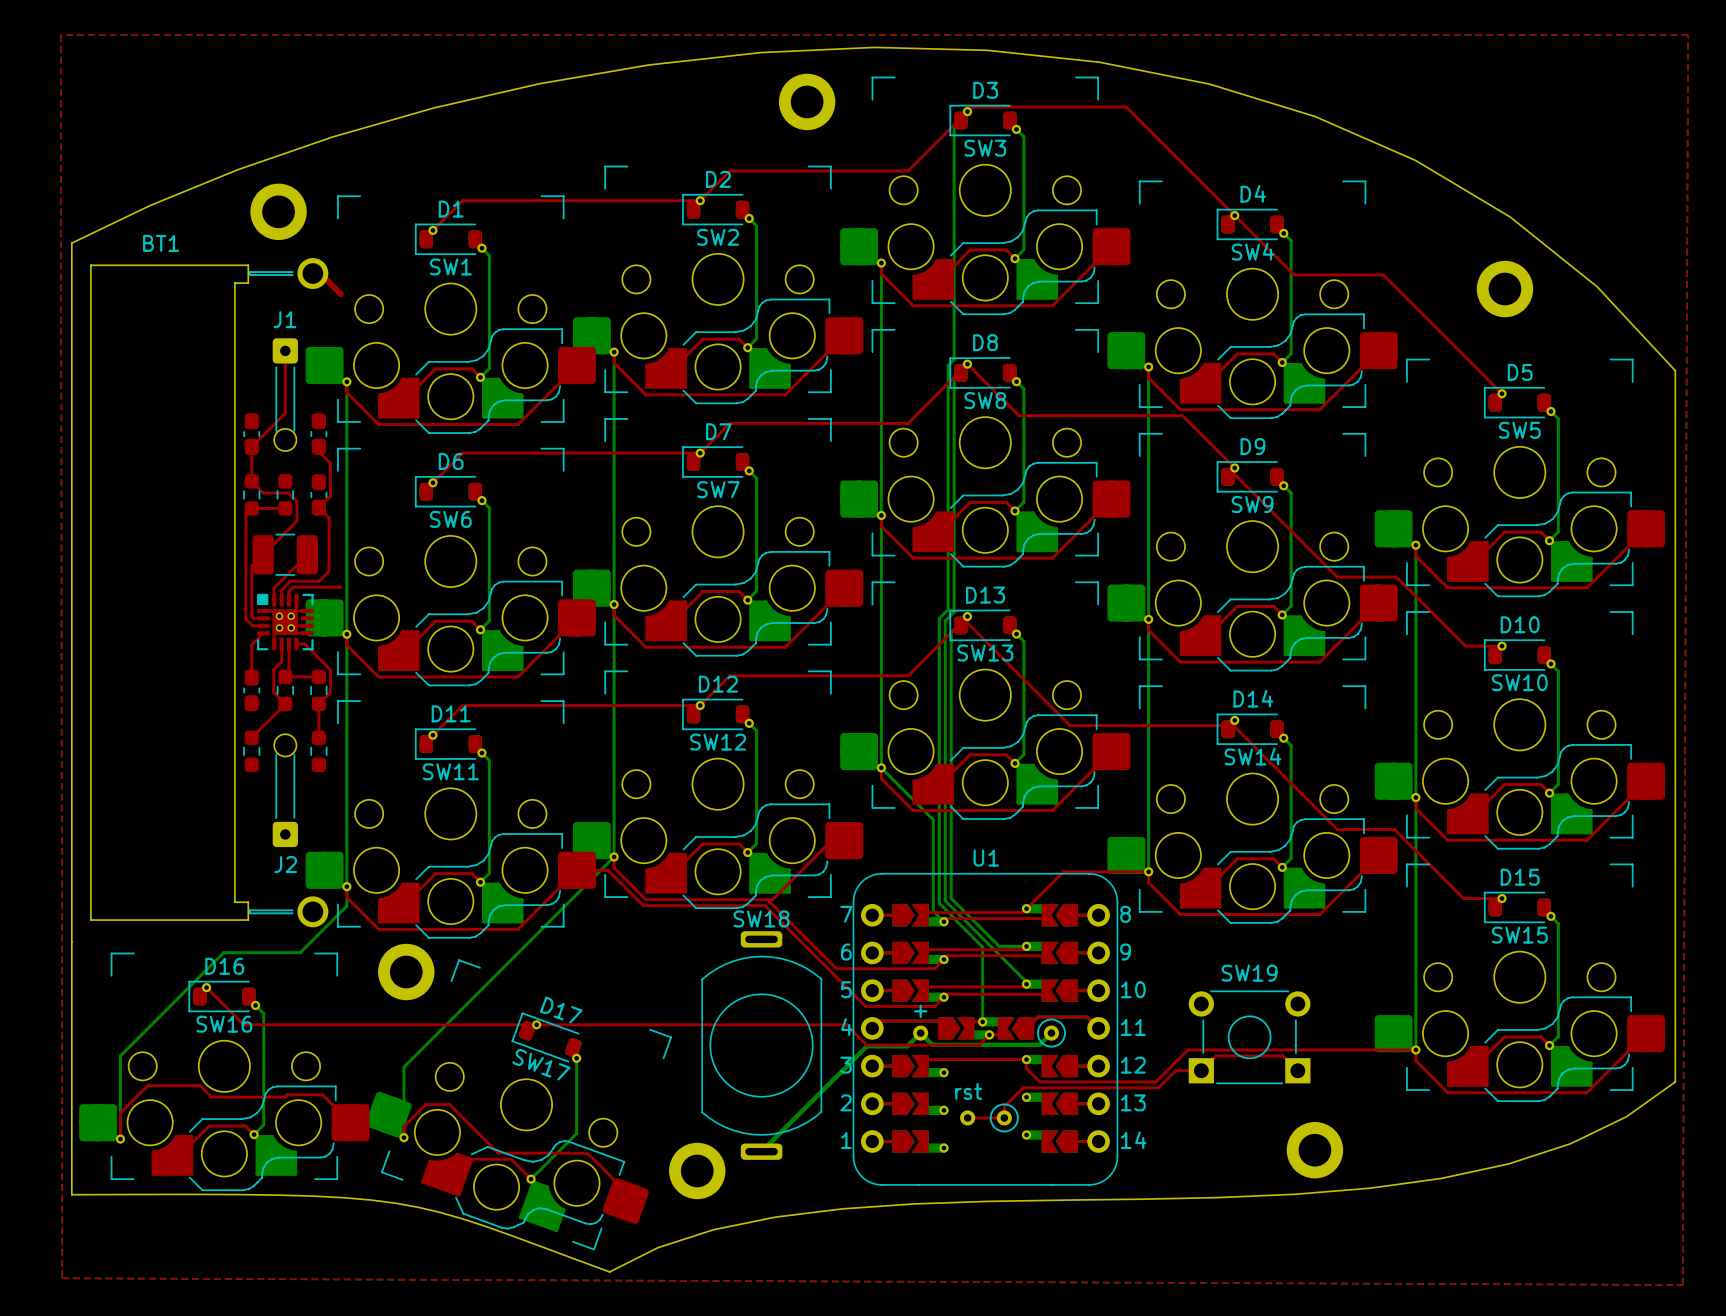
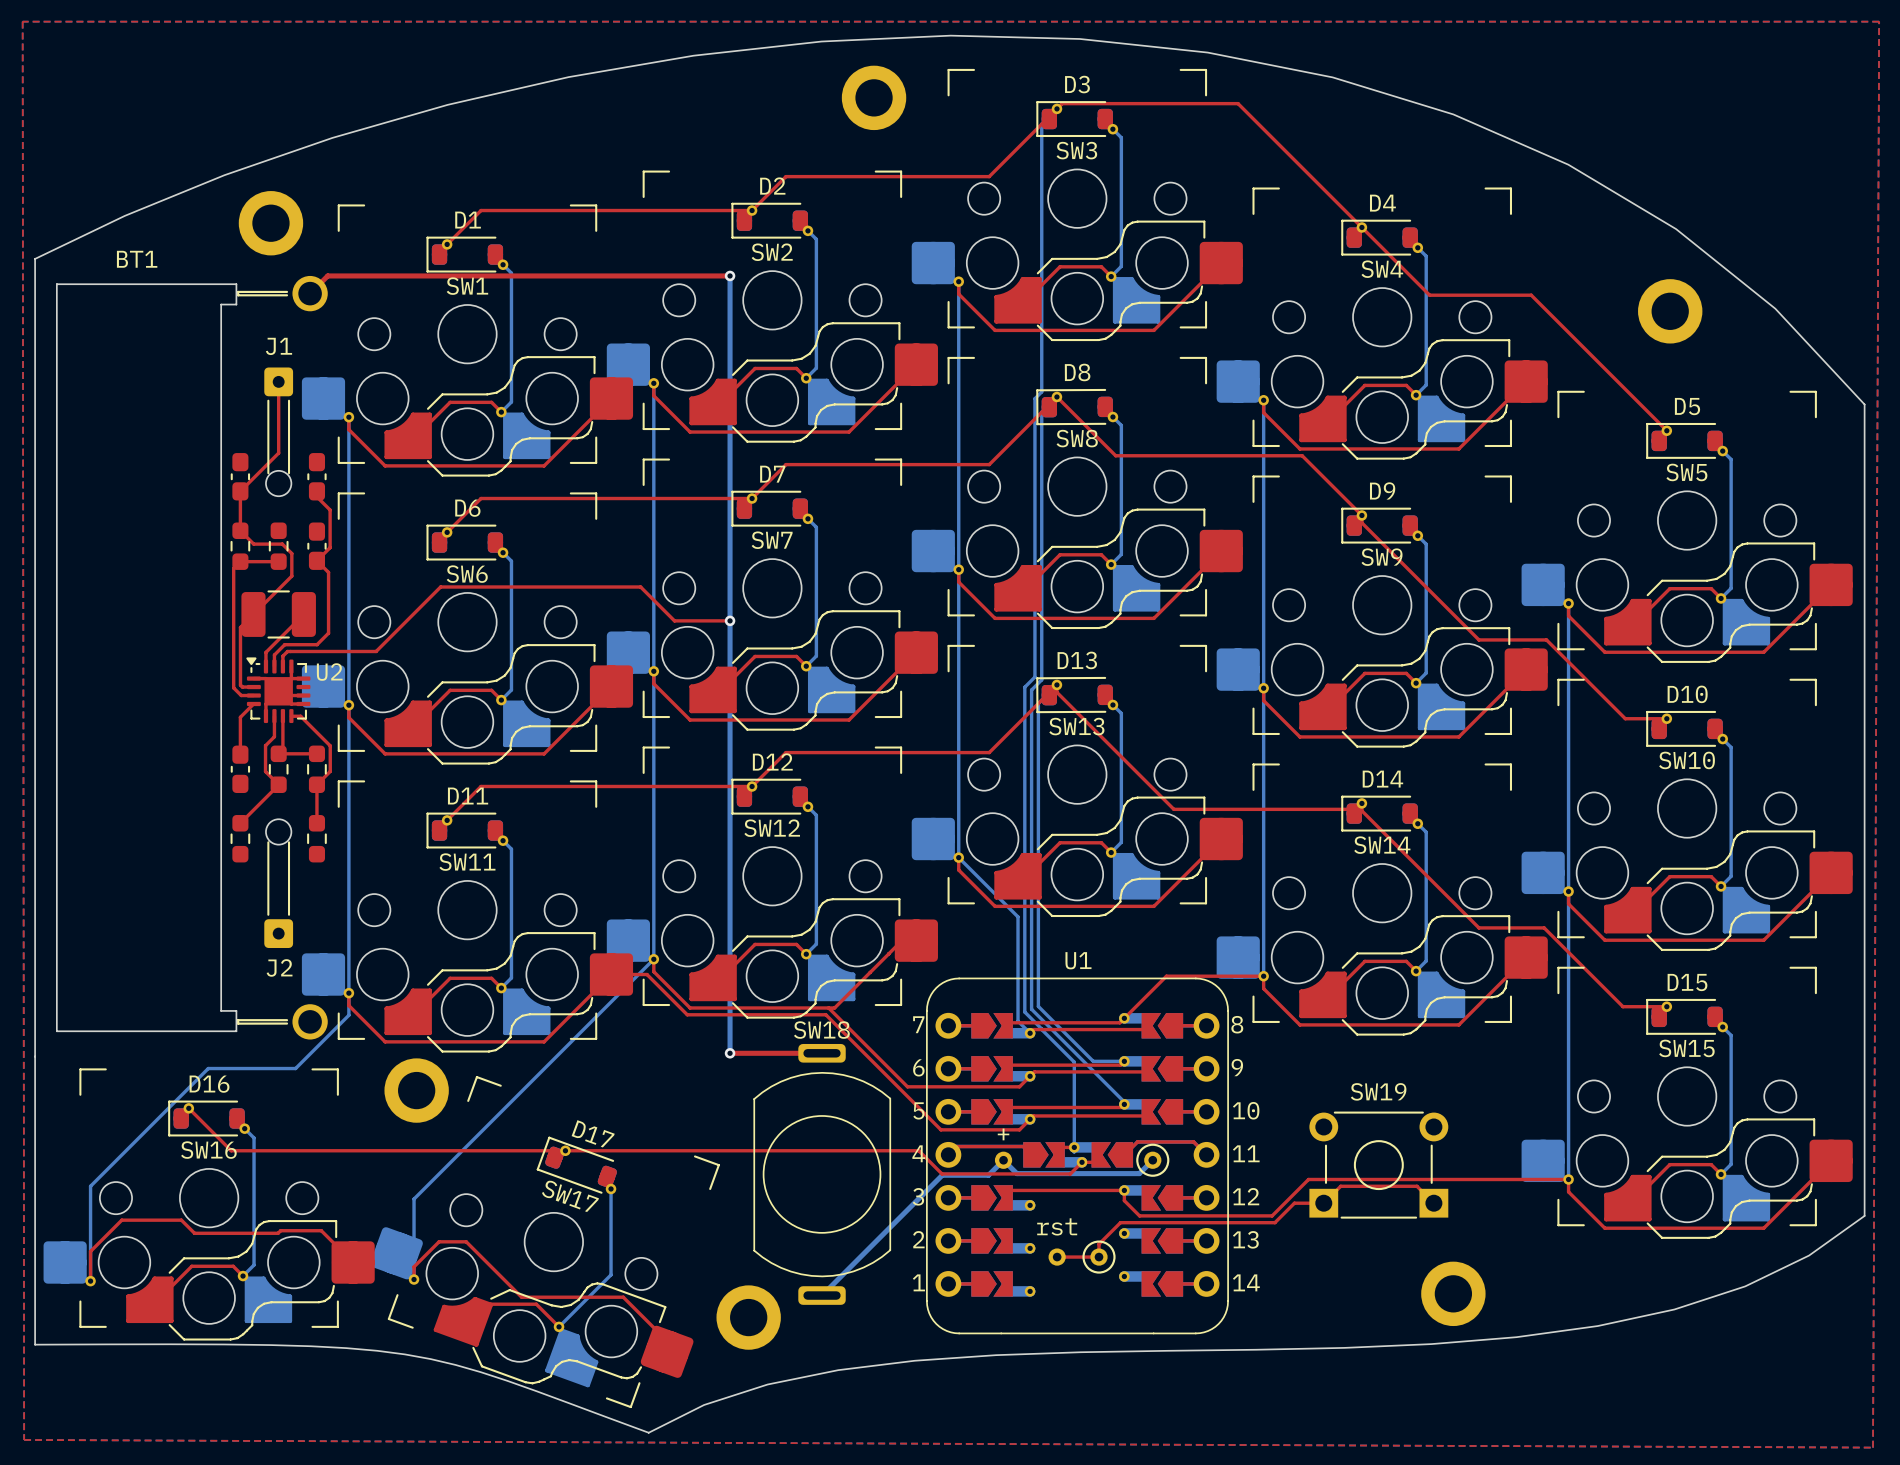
top track: none -> (730, 275) (327, 275) (310, 293)
bottom track: none -> (730, 275) (730, 1053)
via: none -> (730, 275)
top track: (312, 266) (340, 294) -> none
top track: none -> (730, 620) (674, 620) (640, 587) (440, 587) (376, 651) (342, 651)
via: none -> (730, 620)
U2: none -> (278, 690)
part: (285, 622) -> none
top track: none -> (730, 1053) (822, 1053)
via: none -> (730, 1053)

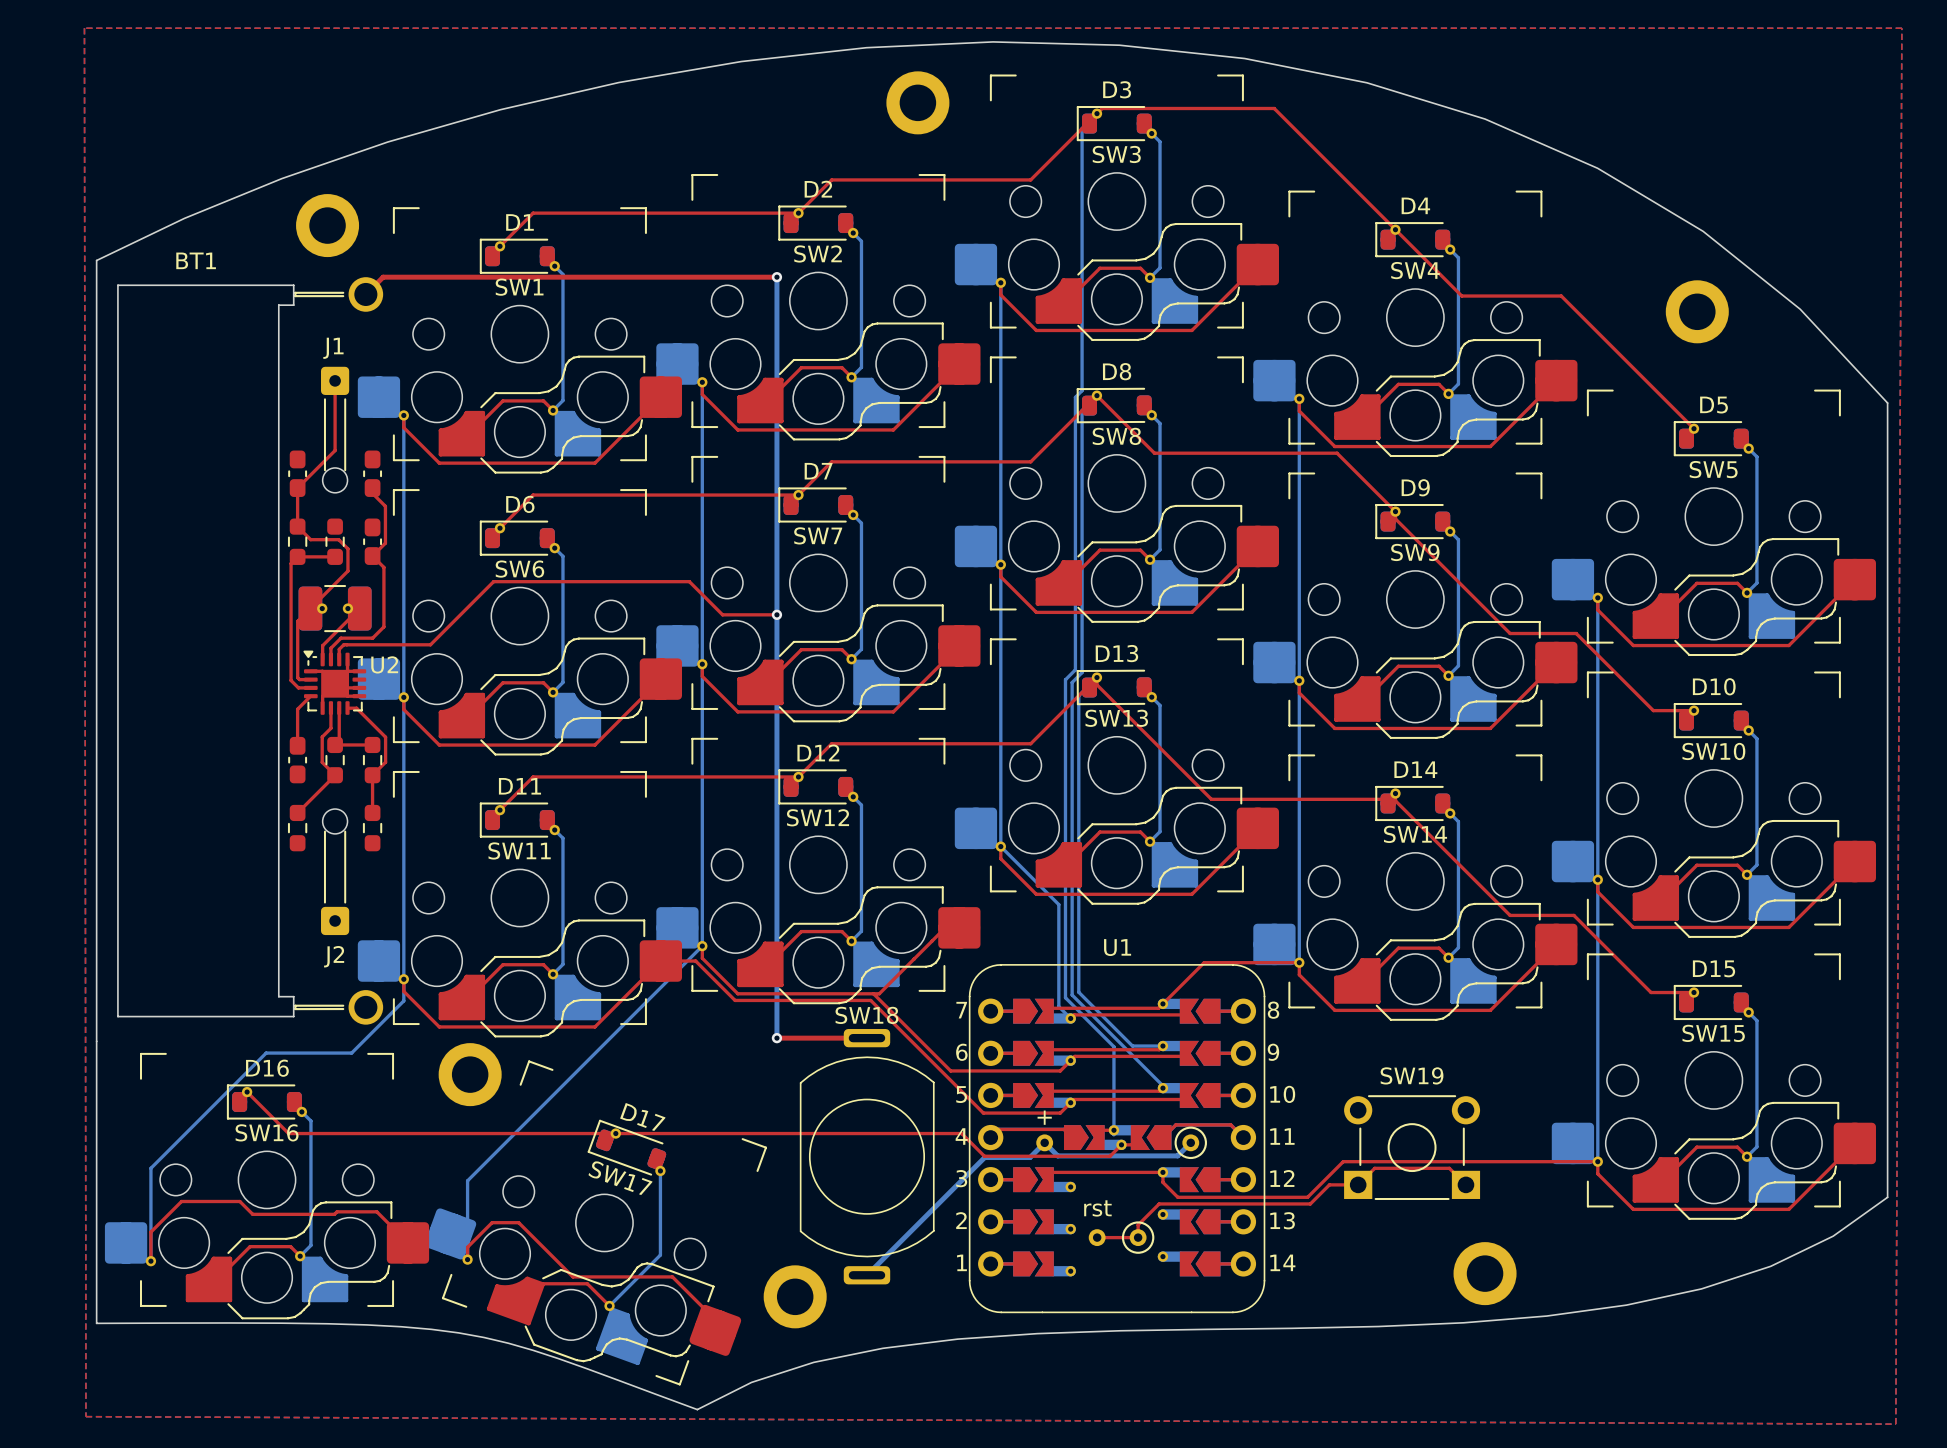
part footprint: [241, 590, 316, 639] -> [298, 585, 372, 633]

